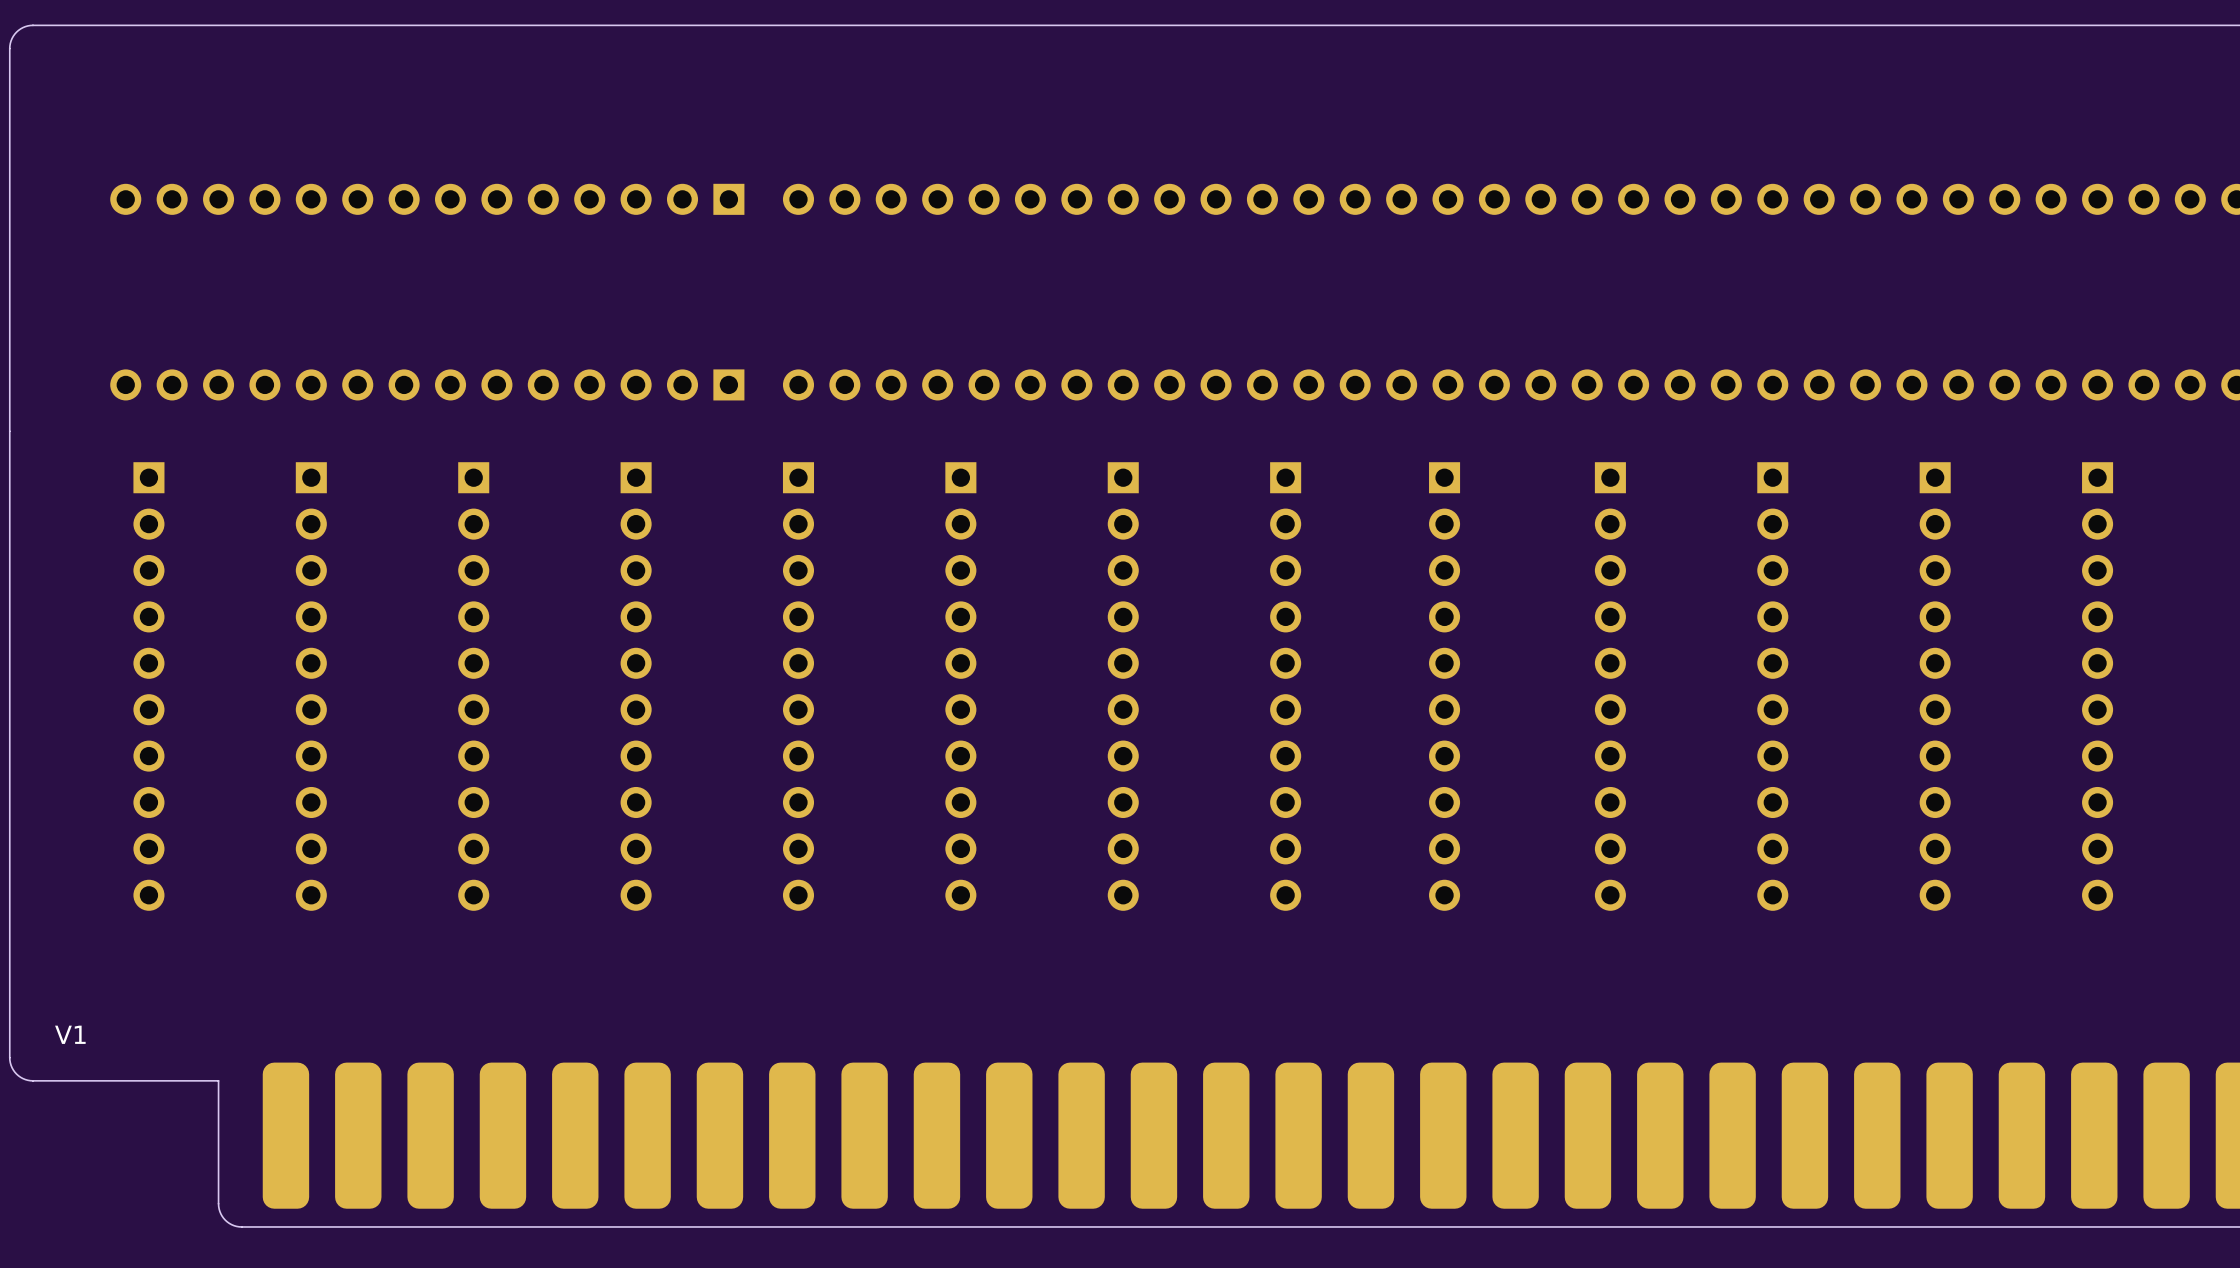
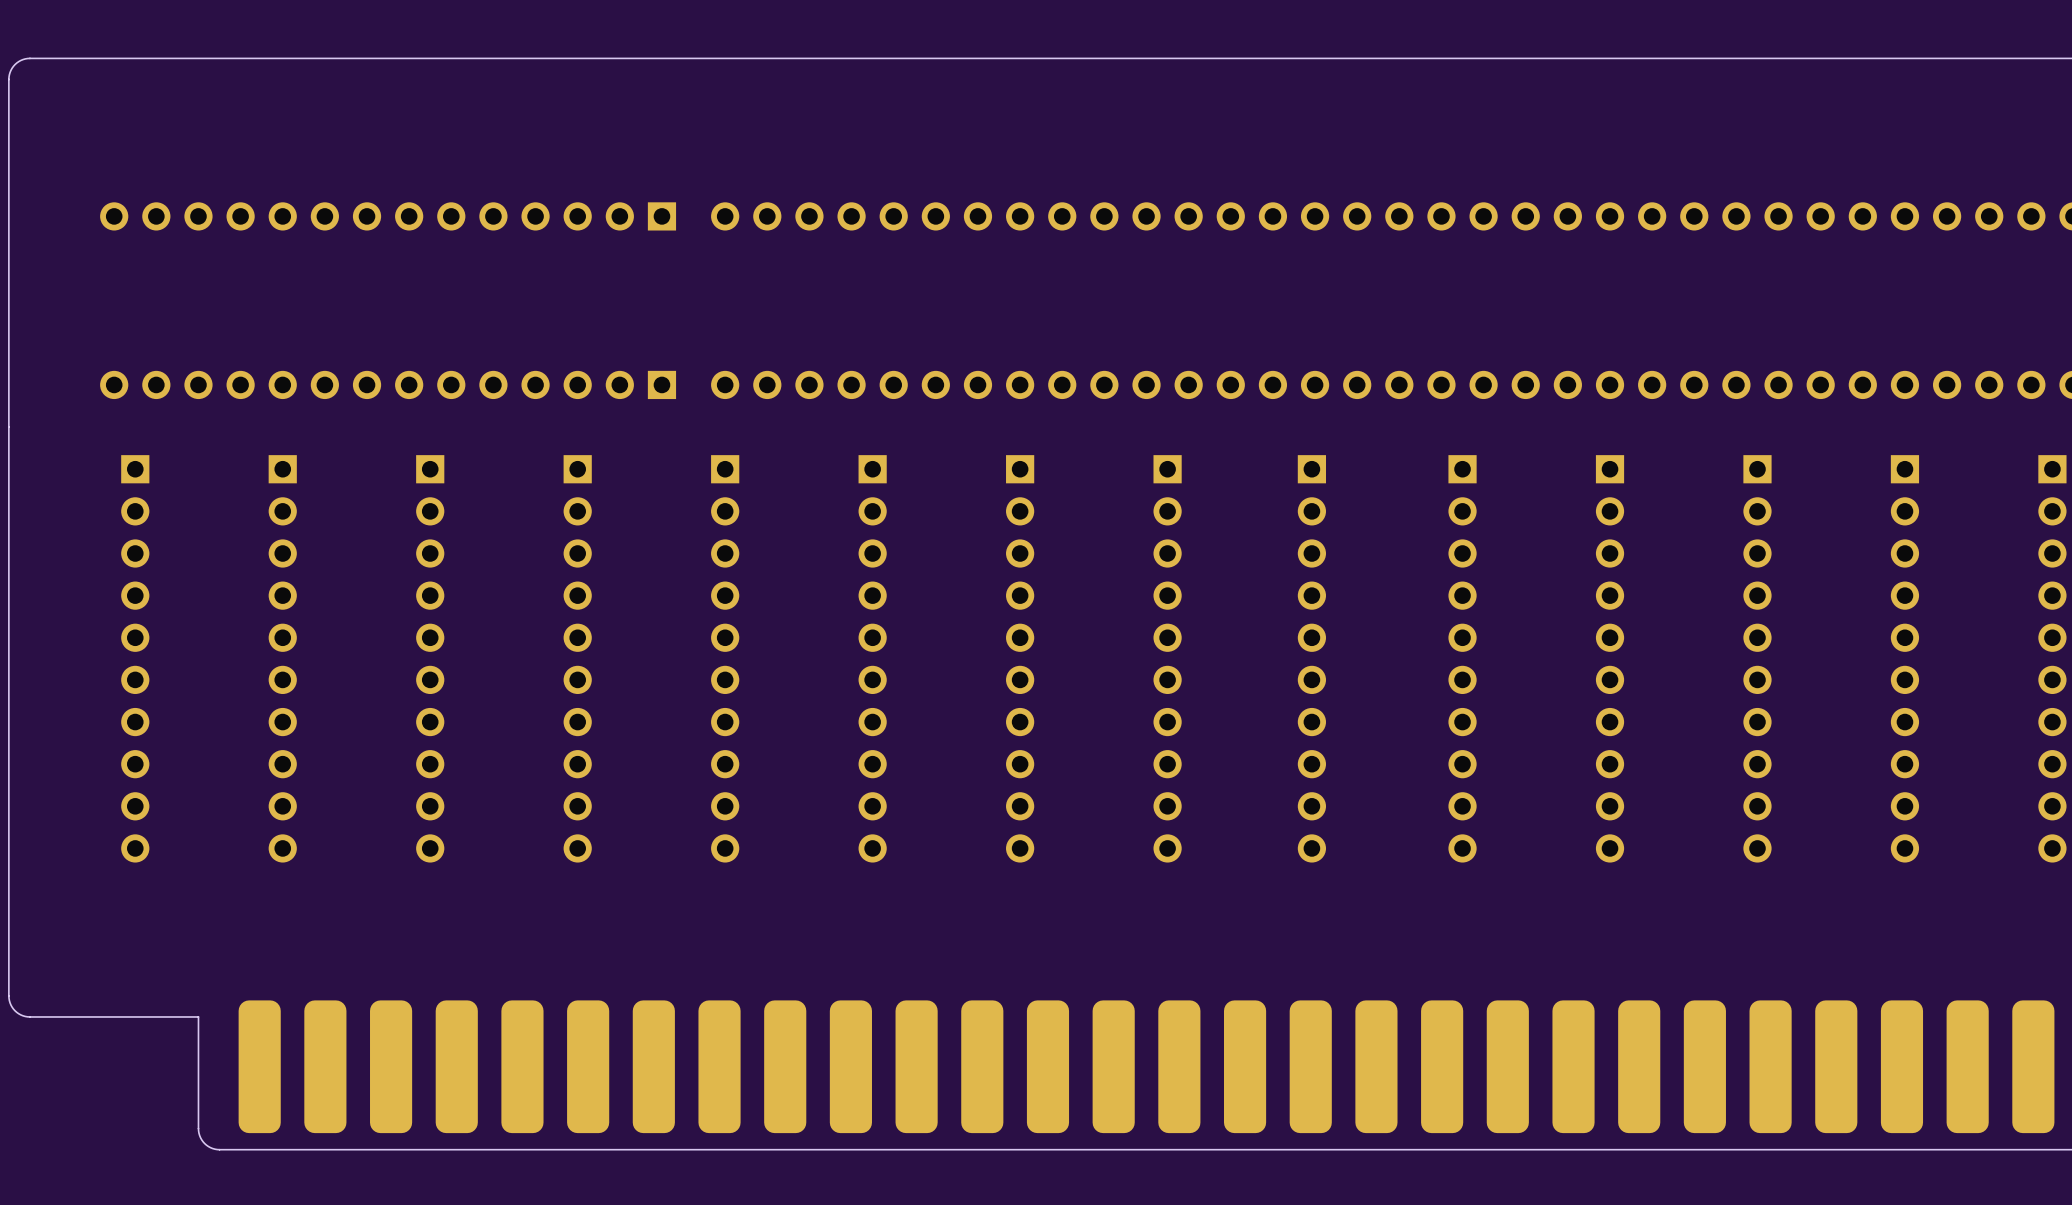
text: V1 (70, 1034) -> none

